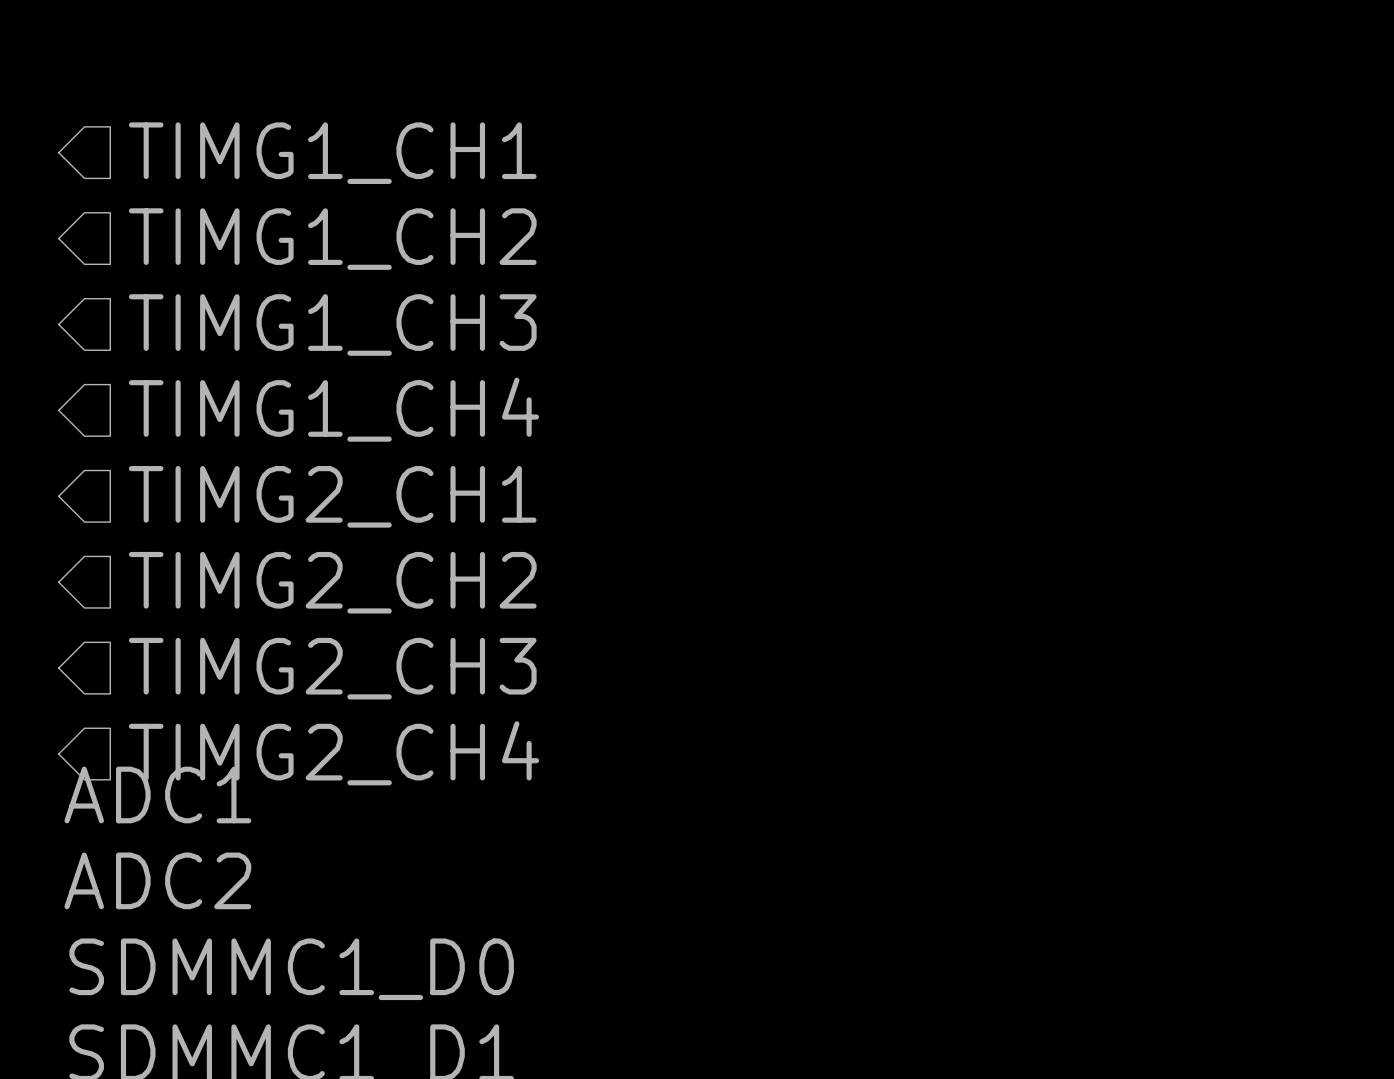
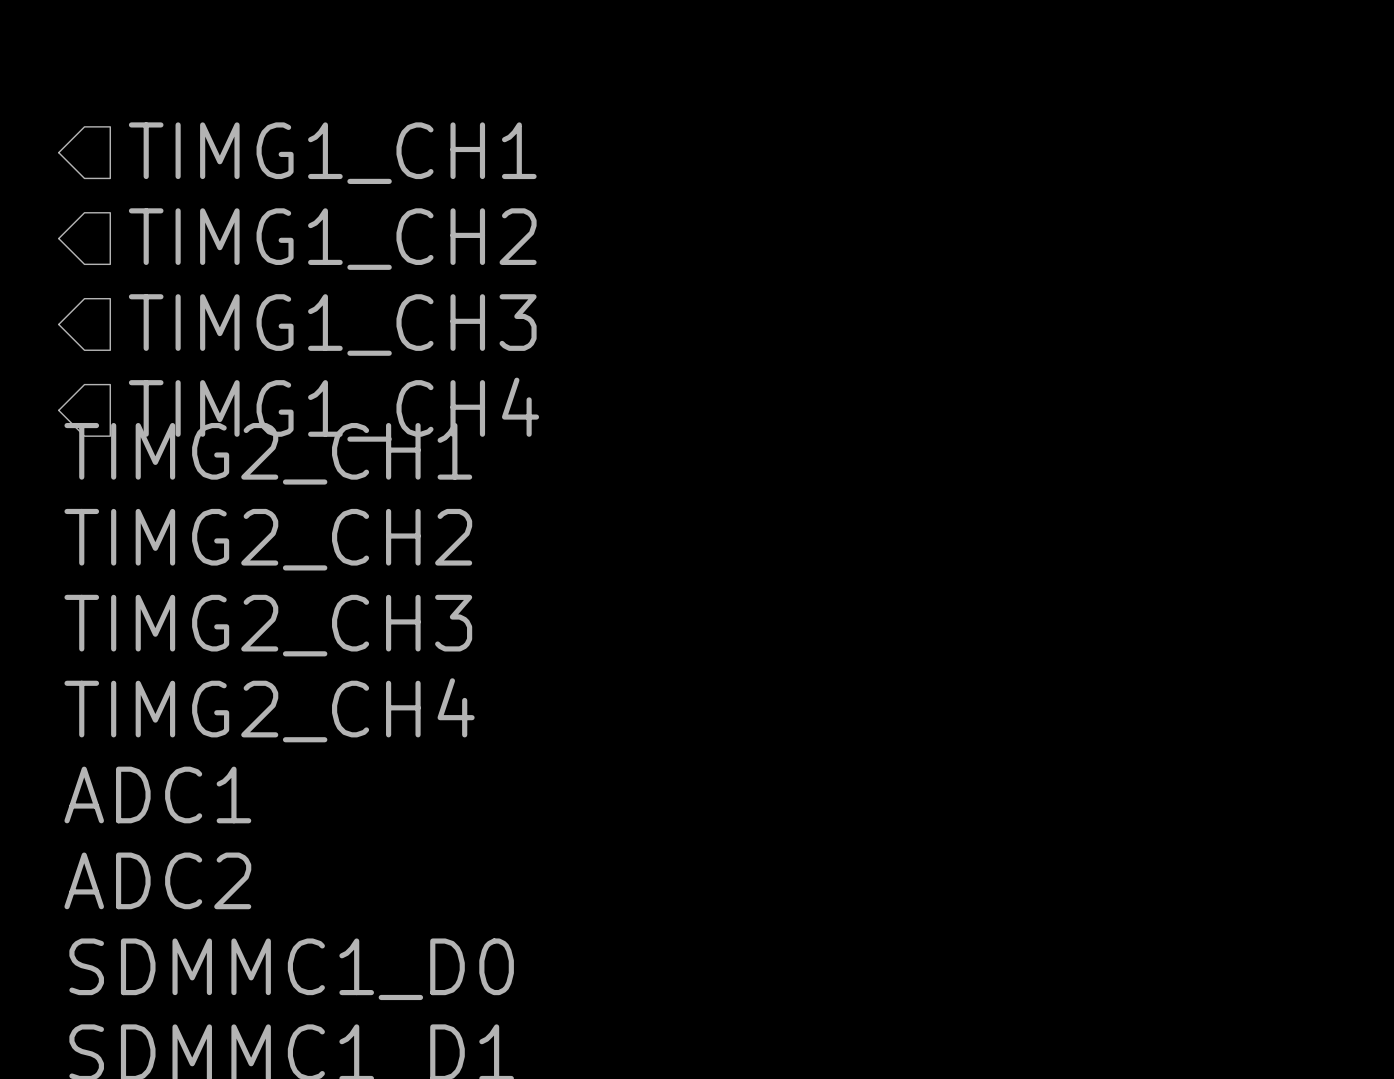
label: none -> TIMG2_CH1 (268, 453)
hierarchical label: TIMG2_CH1 (332, 496) -> none
label: none -> TIMG2_CH2 (268, 539)
hierarchical label: TIMG2_CH2 (332, 582) -> none
label: none -> TIMG2_CH3 (268, 625)
hierarchical label: TIMG2_CH3 (332, 668) -> none
label: none -> TIMG2_CH4 (269, 710)
hierarchical label: TIMG2_CH4 (333, 753) -> none

